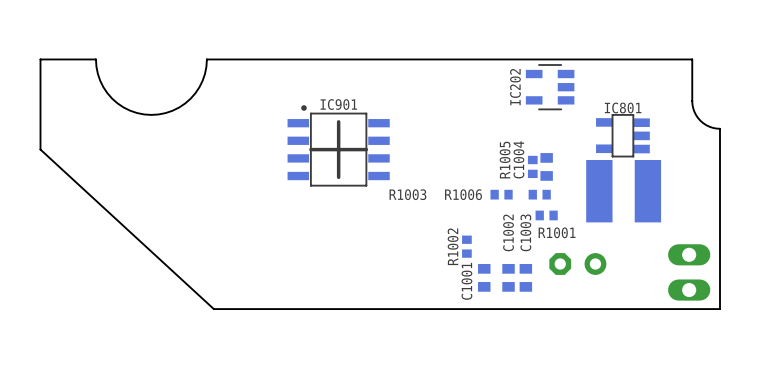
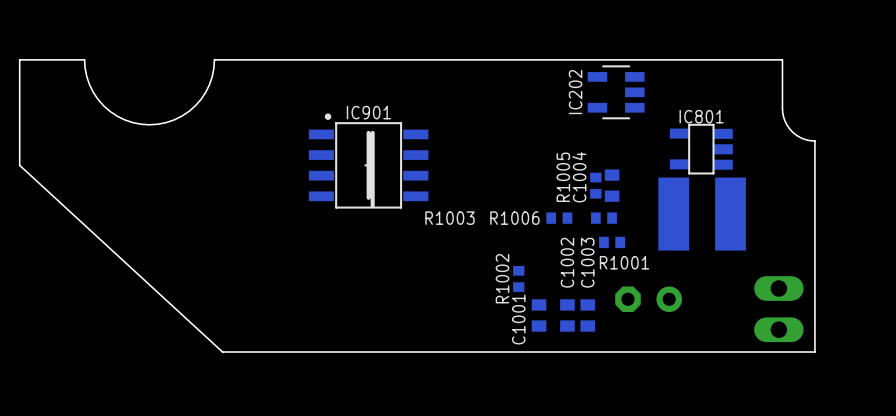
line: none -> (372, 132) (372, 205)
line: (366, 149) (310, 149) -> none

